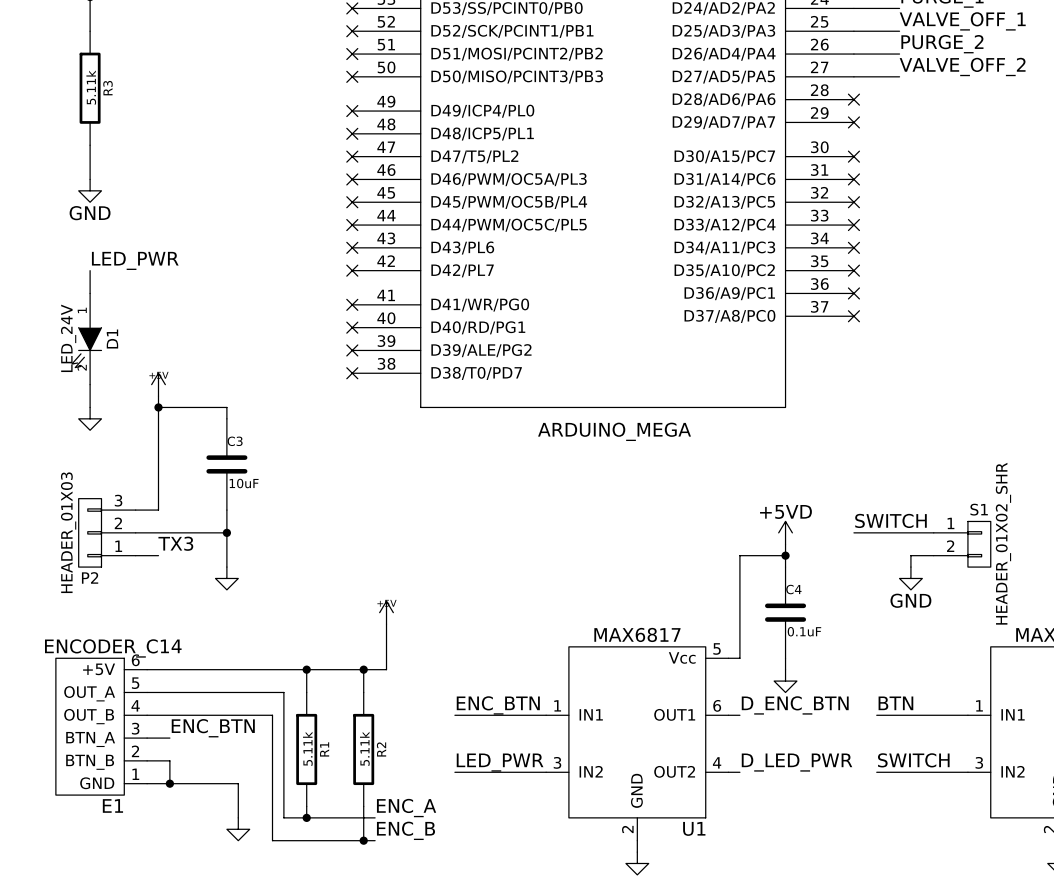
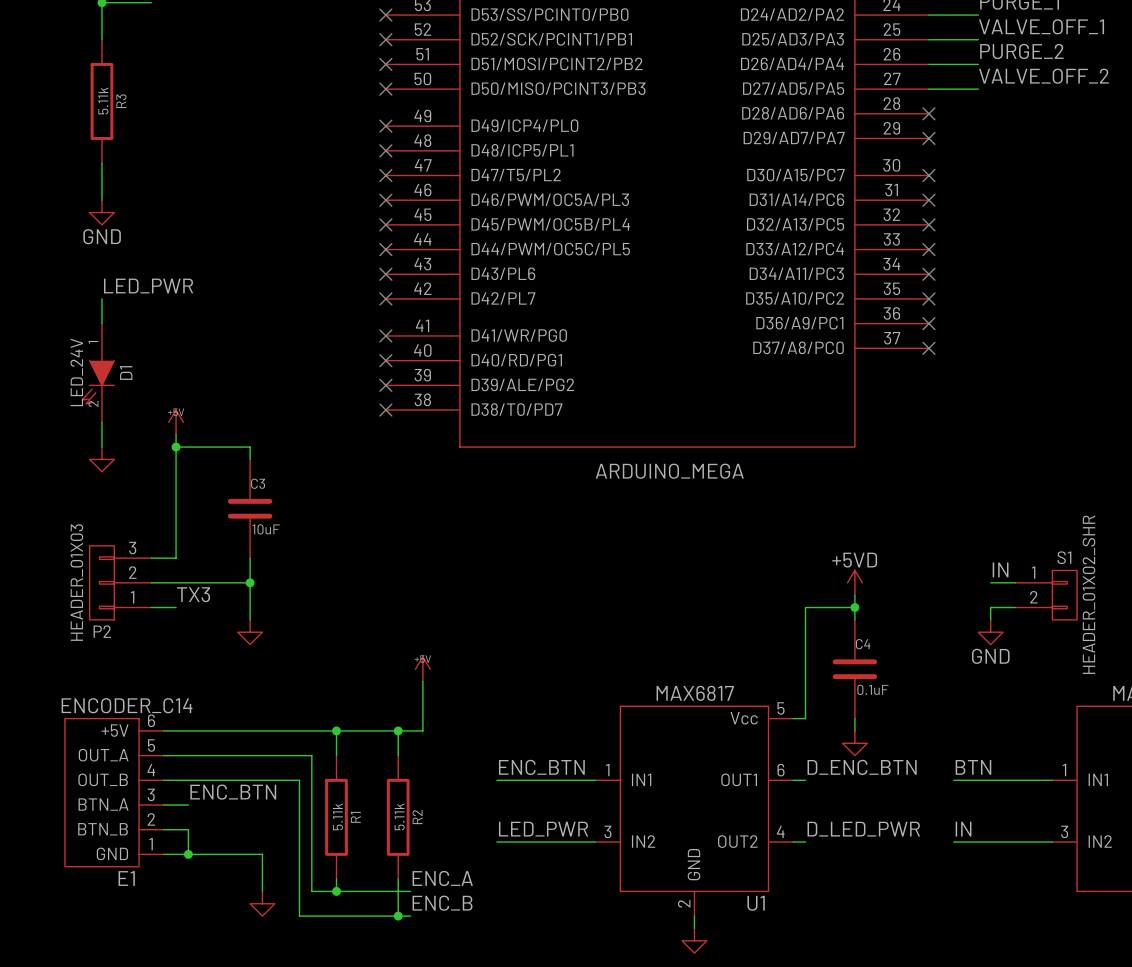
label: SWITCH (890, 520) -> none
label: none -> IN (1000, 569)
wire: (853, 532) (910, 532) -> none
label: SWITCH (913, 760) -> IN (963, 829)

